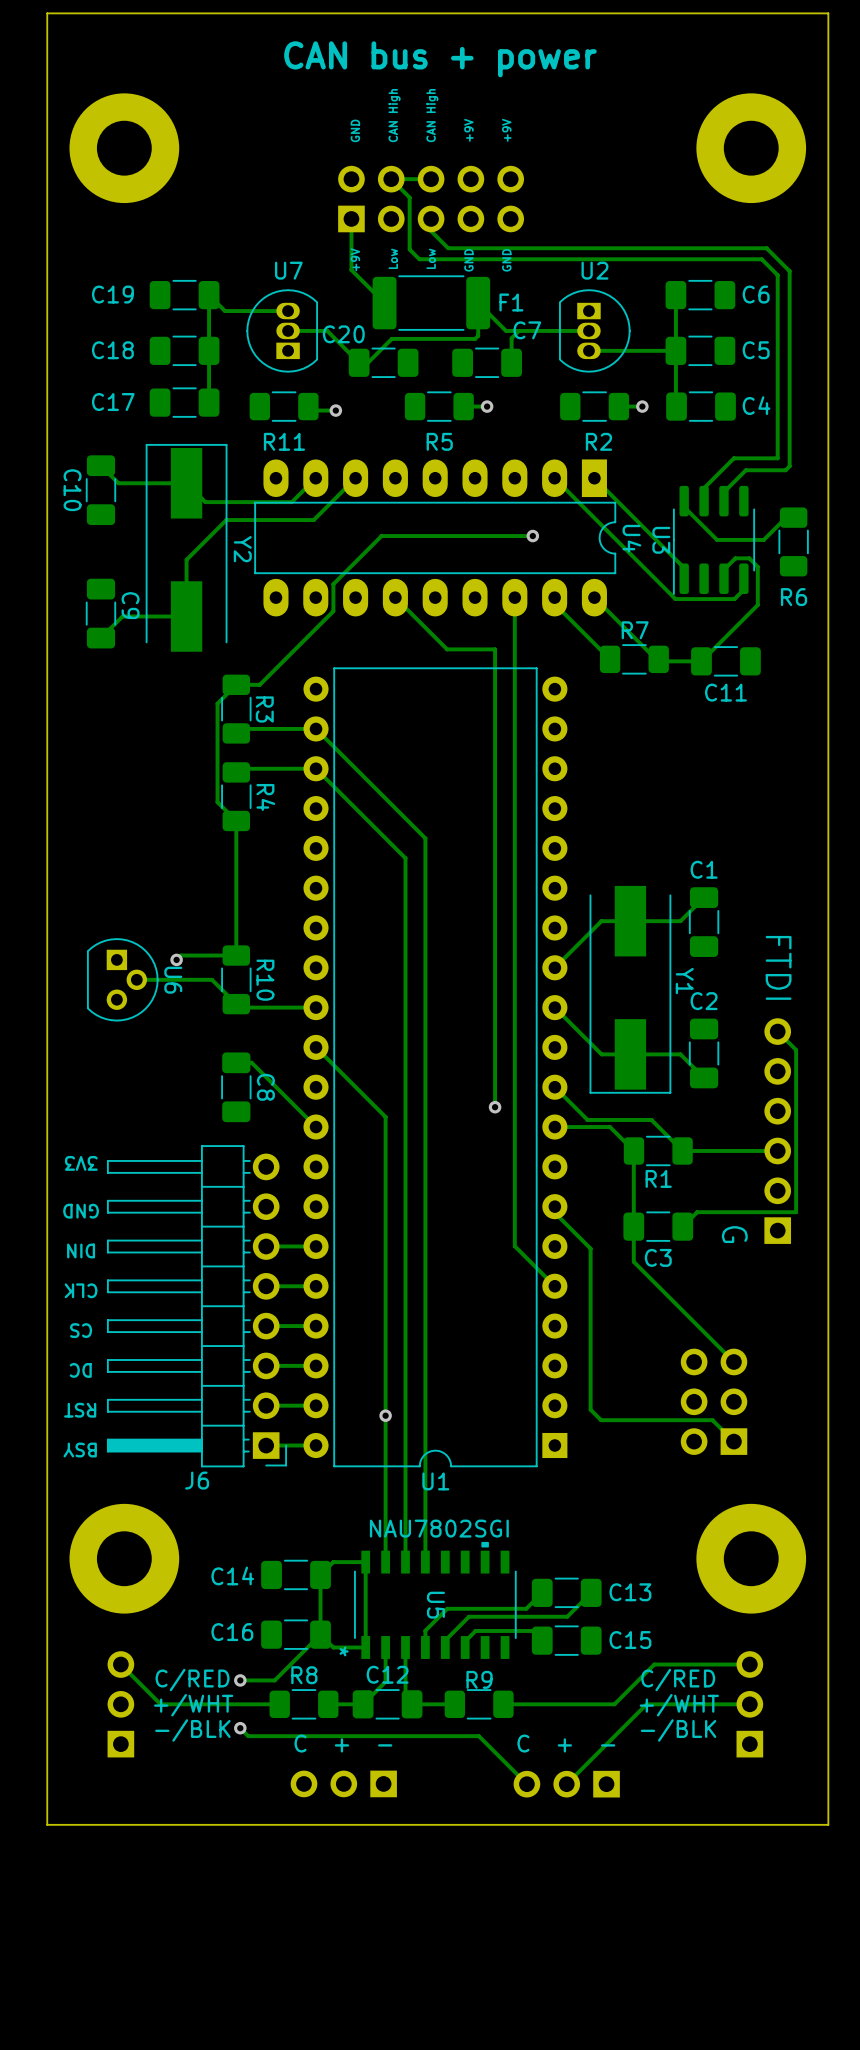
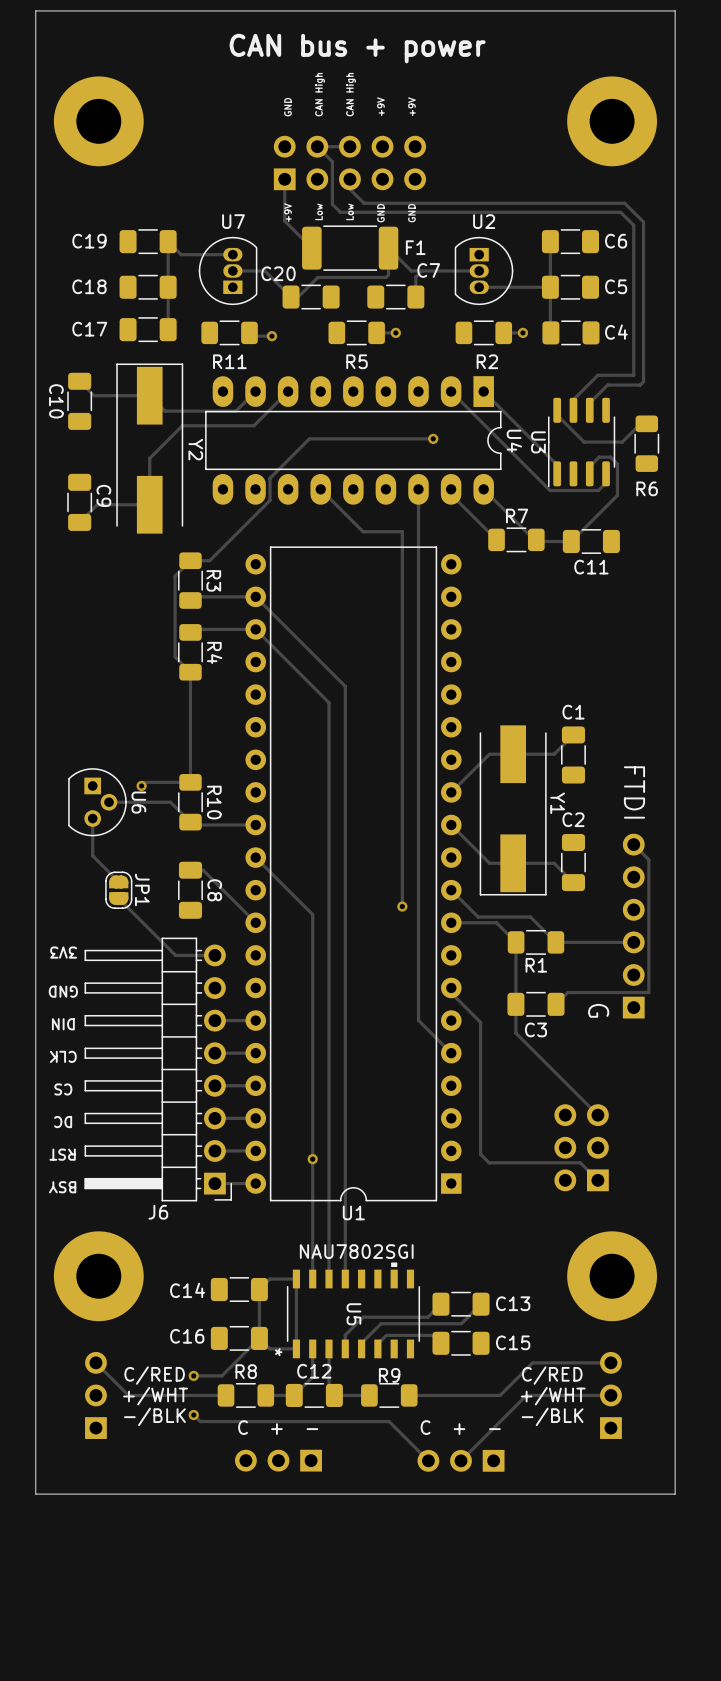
track: none -> (92, 818) (92, 855) (118, 881)
JP1: none -> (118, 890)
track: none -> (118, 898) (175, 955) (214, 955)

